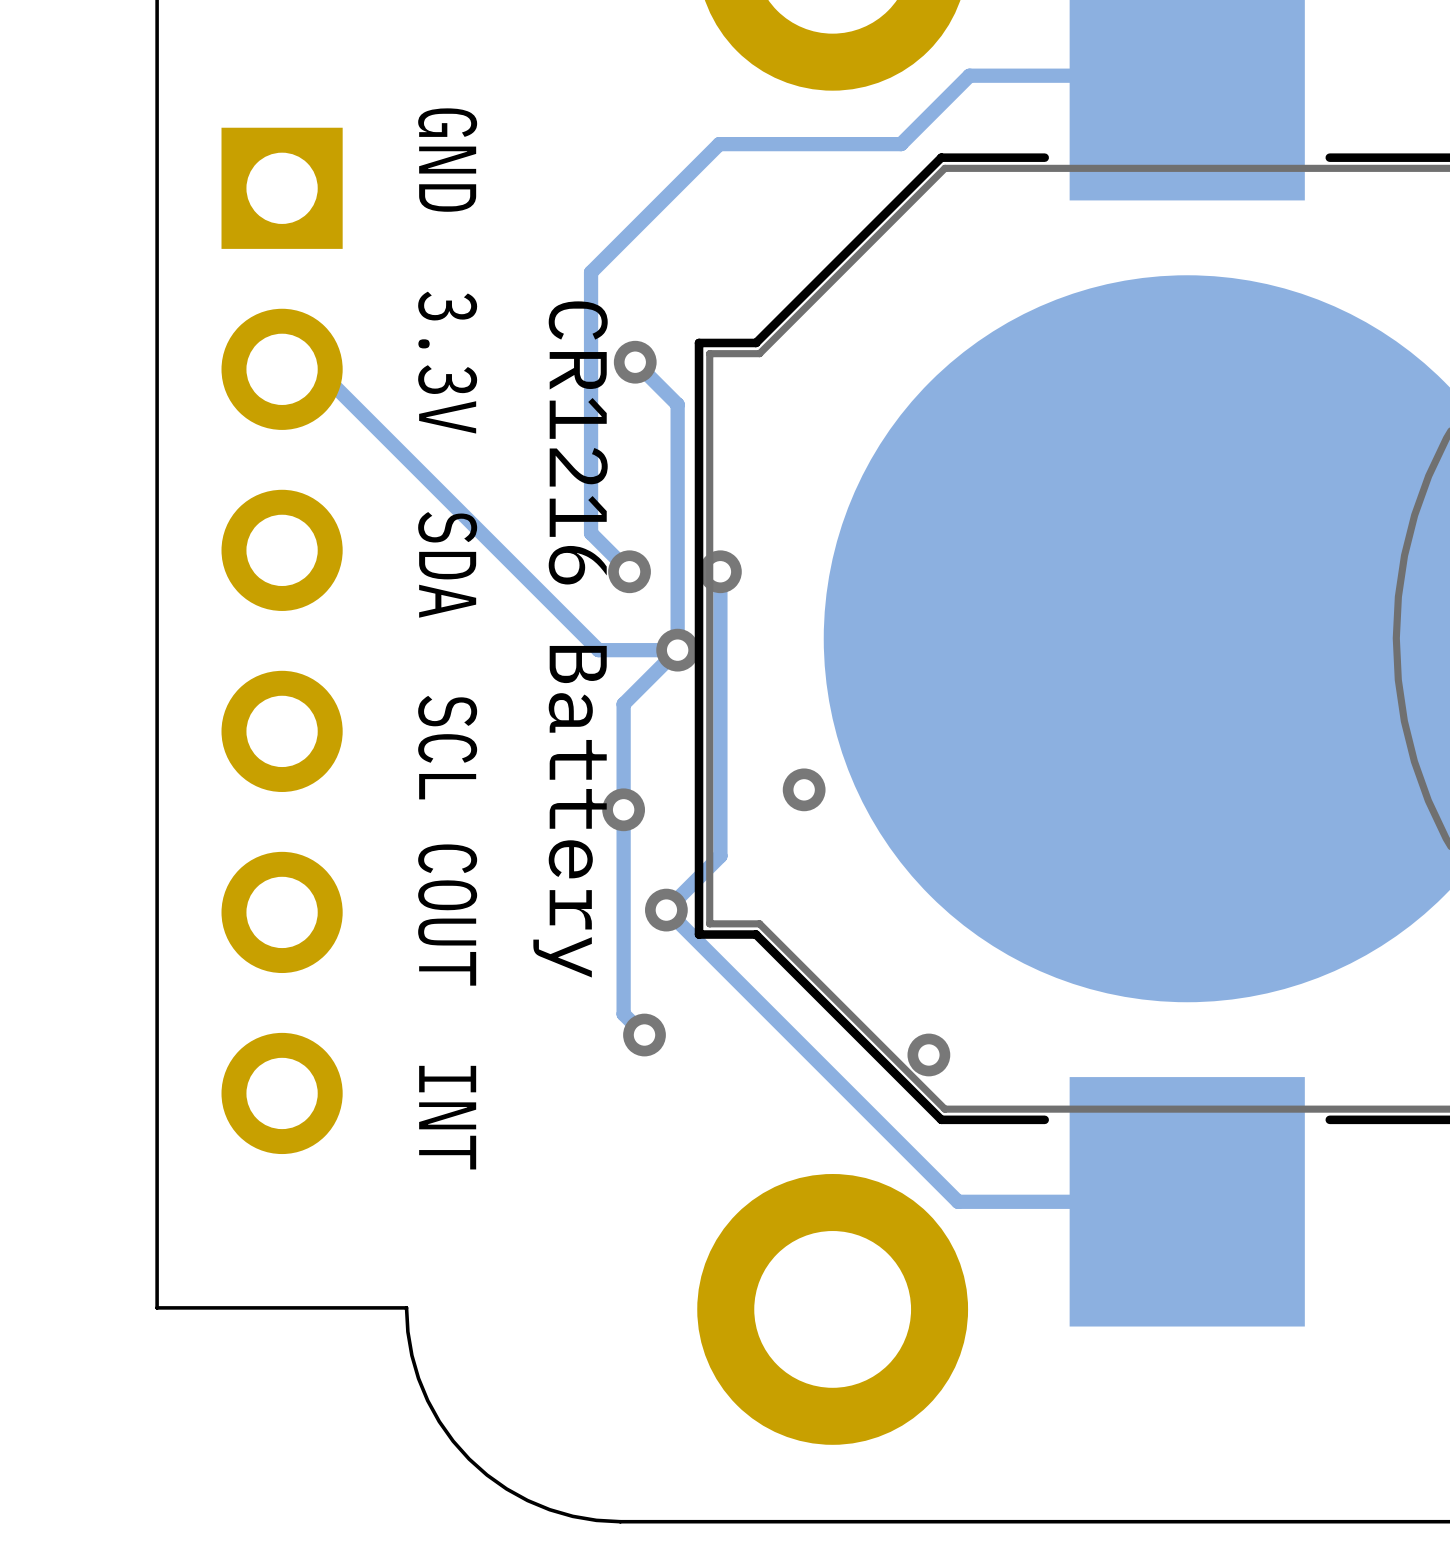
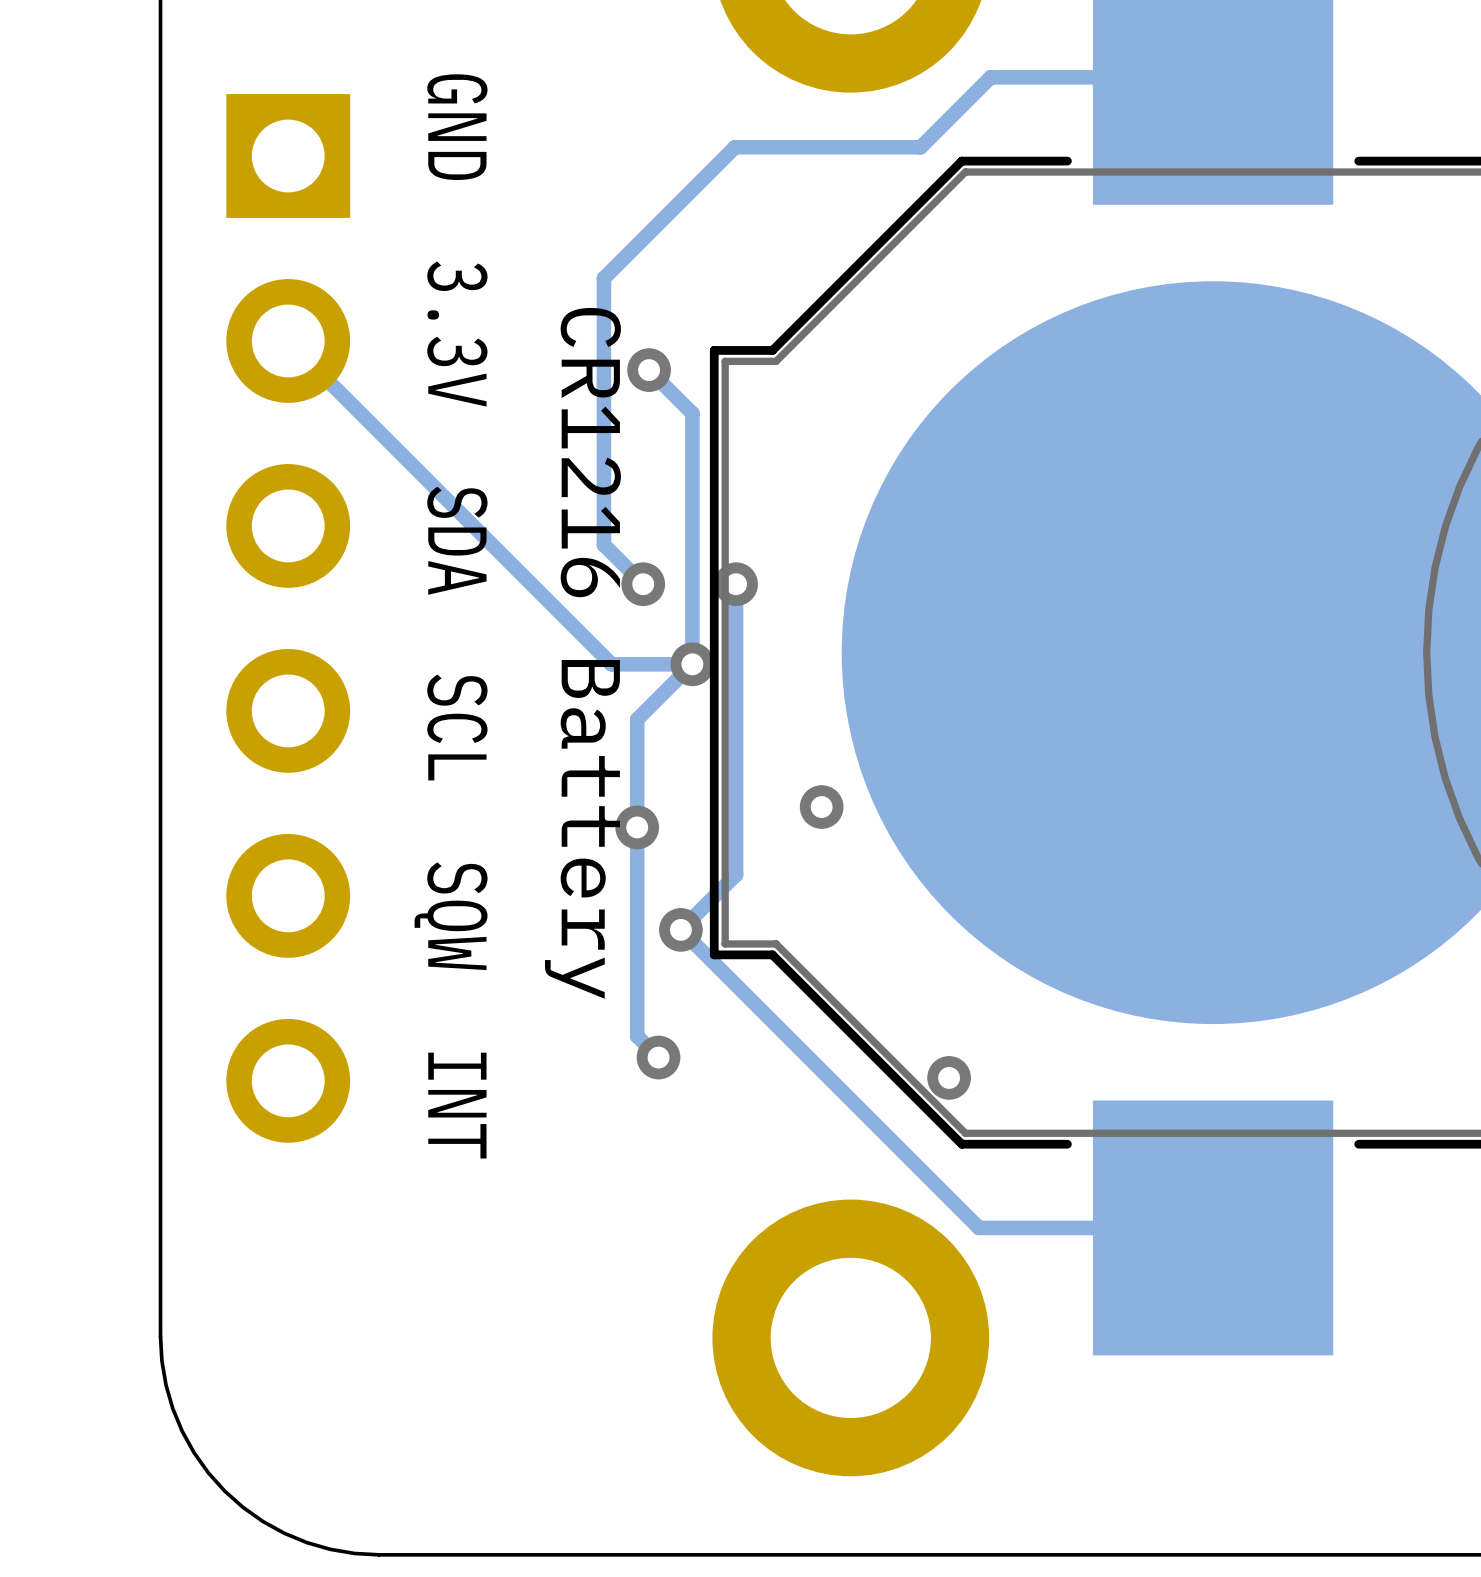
text: GND 3.3V SDA SCL COUT INT (447, 638) -> GND 3.3V SDA SCL SQW INT (451, 616)
part position: (282, 640) -> (288, 618)
board edge: (157, 1307) (406, 1307) (411, 1355) (427, 1400) (439, 1421) (469, 1459) (487, 1475) (527, 1500) (572, 1516) (620, 1521) -> (160, 1336) (161, 1360) (172, 1408) (194, 1452) (208, 1472) (242, 1507) (284, 1533) (306, 1542) (354, 1553) (633, 1554)

